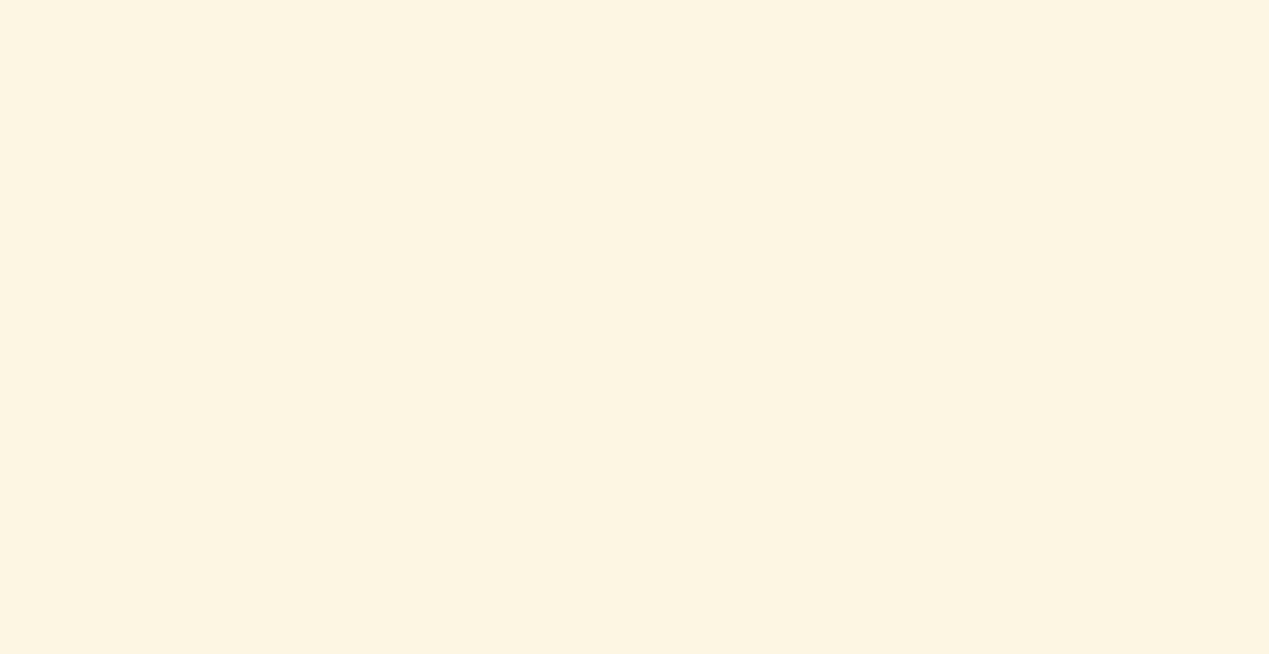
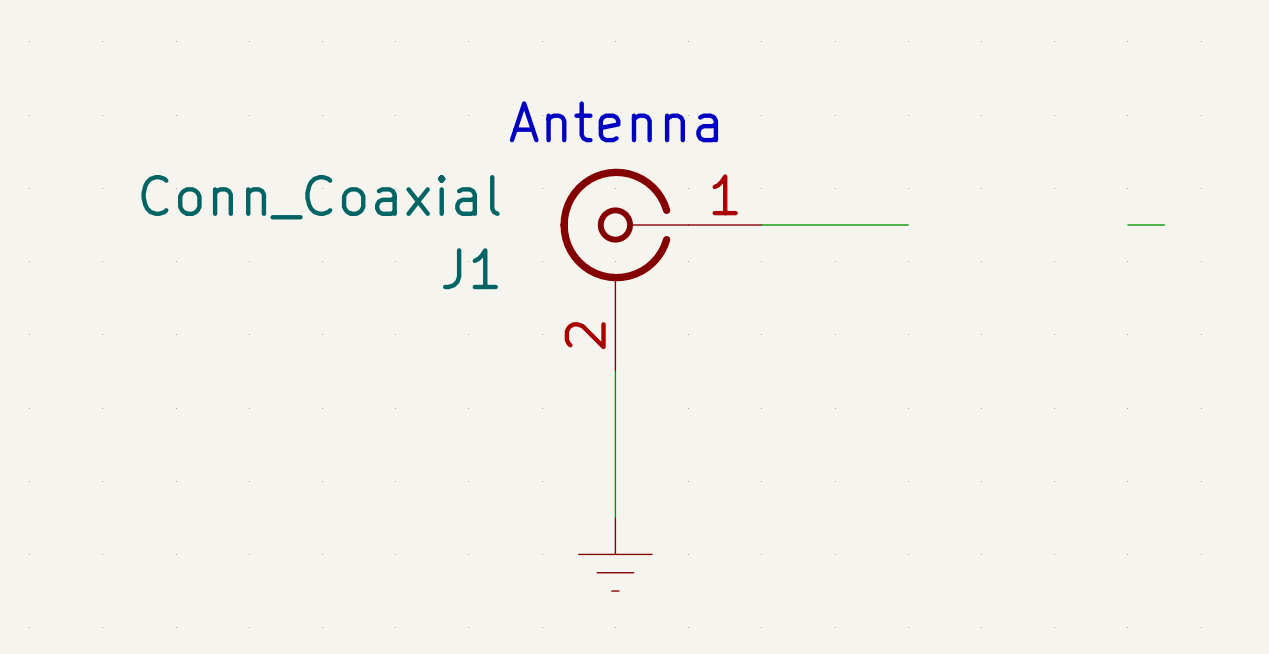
text: none -> Antenna (613, 121)
wire: none -> (761, 225) (908, 225)
wire: none -> (1127, 225) (1164, 225)
J1: none -> Conn_Coaxial (661, 270)
wire: none -> (615, 371) (615, 517)
power symbol: none -> (615, 554)

